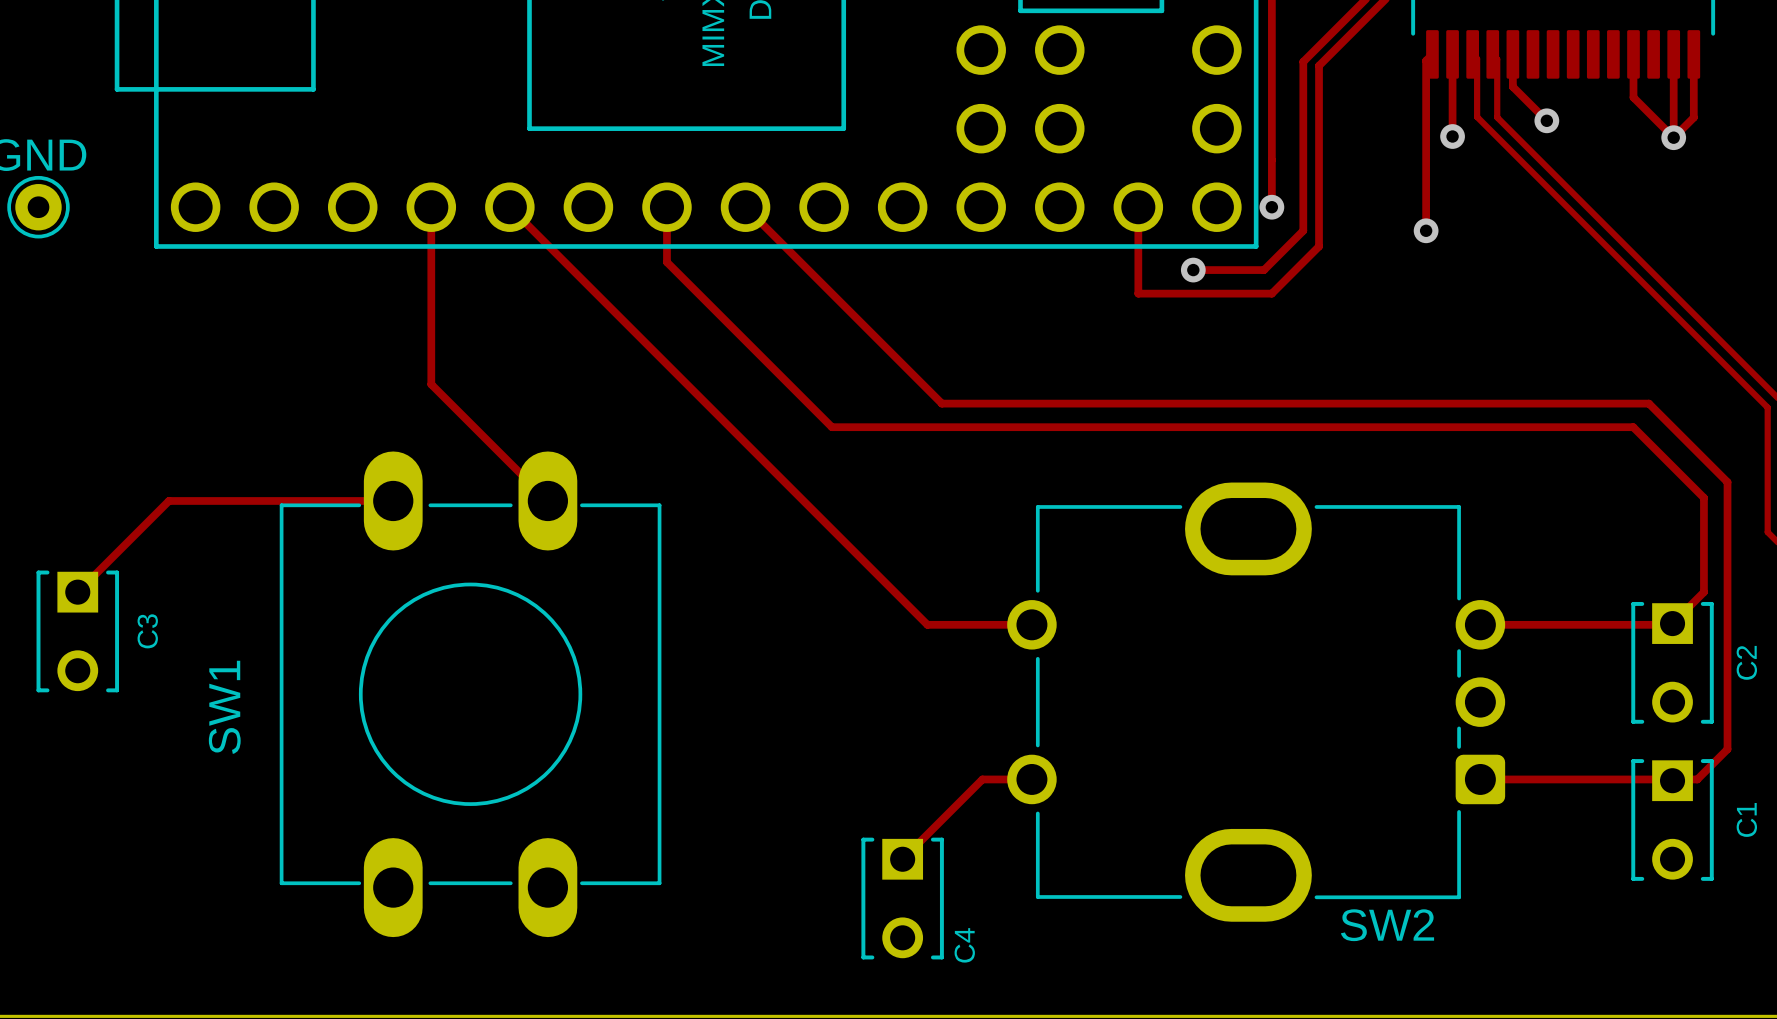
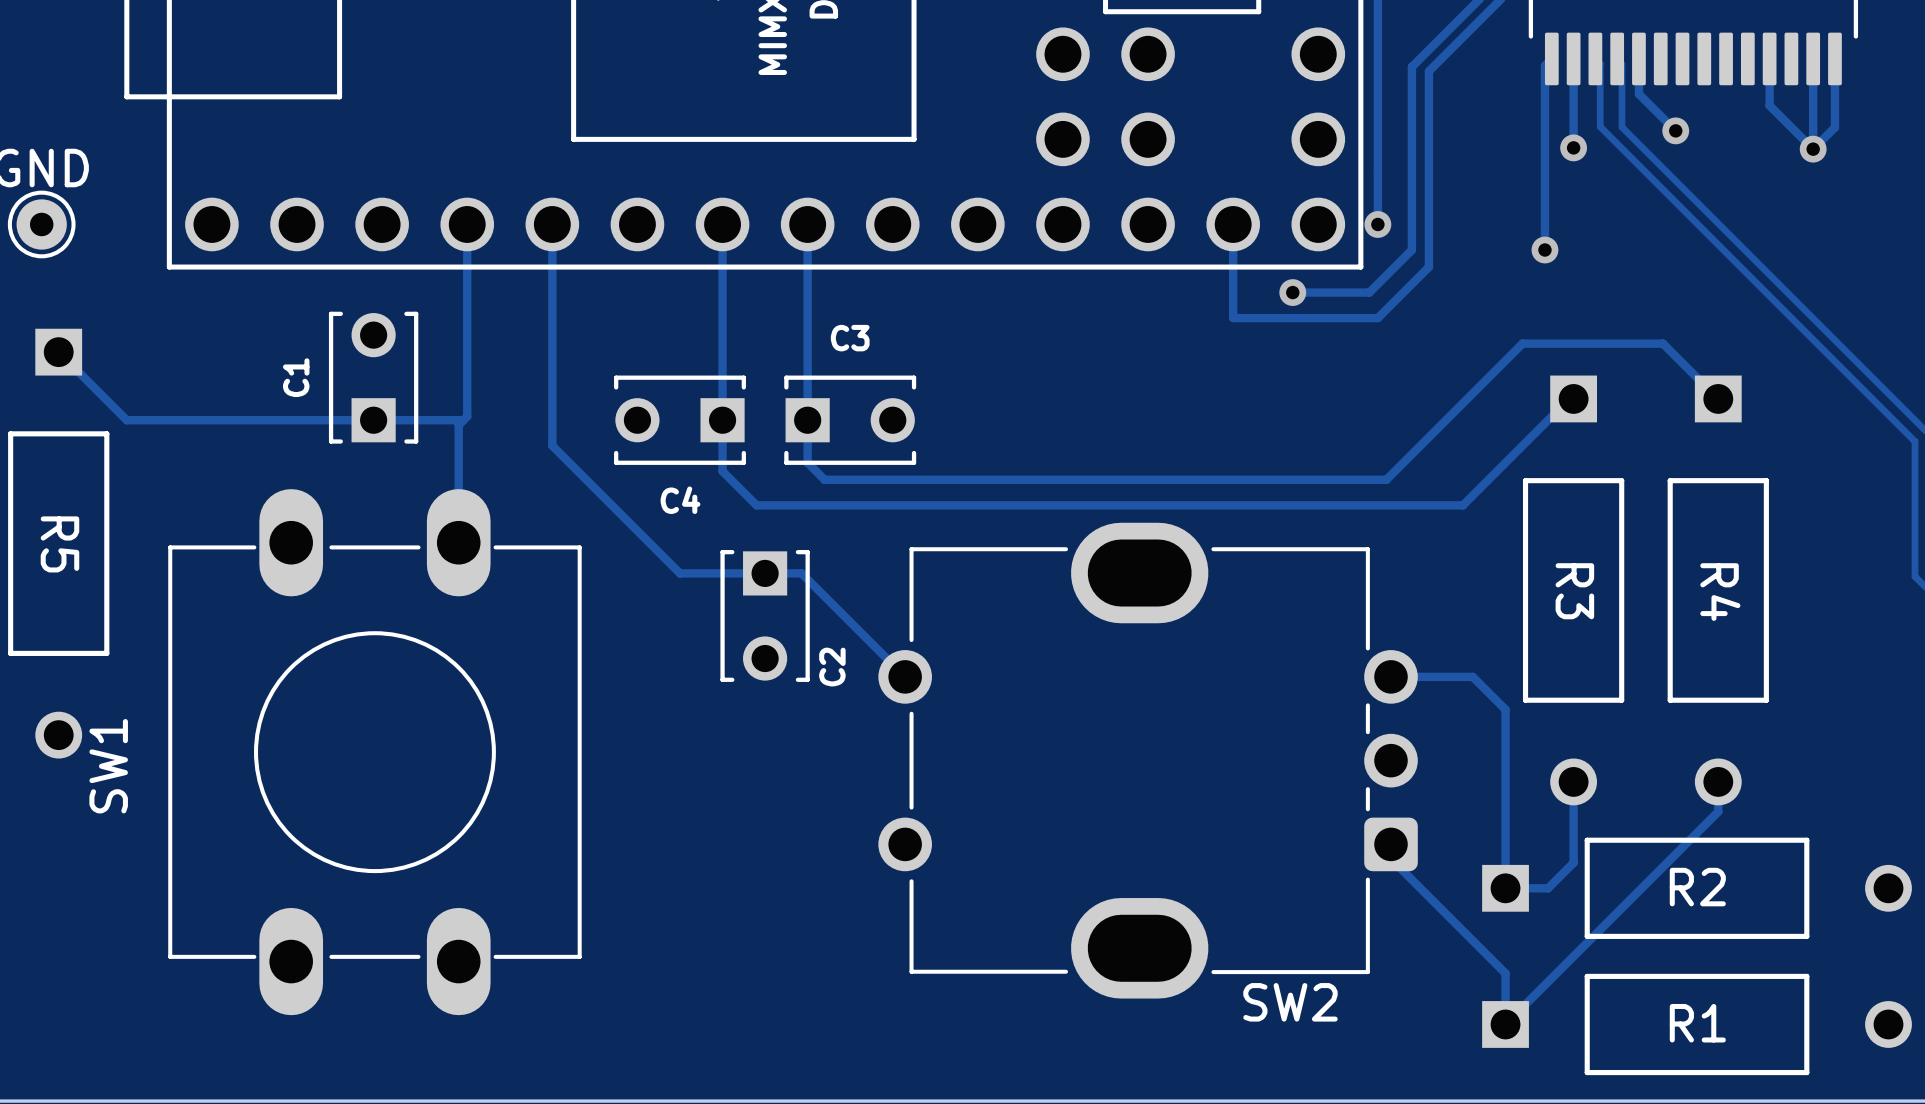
track: (509, 207) (927, 624) (1031, 624) -> (552, 224) (552, 445) (680, 573) (801, 573) (905, 676)
track: (745, 207) (941, 403) (1648, 403) (1727, 482) (1727, 749) (1697, 779) (1480, 779) -> (807, 224) (807, 462) (824, 479) (1386, 479) (1522, 343) (1662, 343) (1718, 398)
track: (666, 262) (831, 427) (1633, 427) (1703, 497) (1703, 592) (1671, 624) (1480, 624) -> (722, 284) (722, 471) (756, 505) (1462, 505) (1569, 398) (1573, 398)
track: none -> (58, 352) (126, 420) (463, 420)
track: (431, 384) (547, 500) -> (467, 416) (458, 424) (458, 542)
track: (393, 500) (168, 500) (77, 592) -> none
R5: none -> (58, 543)
R3: none -> (1573, 590)
R4: none -> (1718, 590)
track: none -> (1391, 676) (1472, 676) (1505, 709) (1505, 888) (1548, 888) (1573, 862) (1573, 781)
C3 rotation: 0° (77, 631) -> 90° counterclockwise (850, 420)
C3 position: (77, 631) -> (850, 420)
C2 position: (1672, 662) -> (765, 615)
C2 name position: C2 (1746, 662) -> C2 (832, 667)
SW1 position: (470, 694) -> (374, 752)
SW2 position: (1256, 702) -> (1148, 760)
track: none -> (1718, 781) (1718, 811) (1505, 1024) (1505, 973) (1391, 858) (1391, 844) (1402, 844)
track: (1031, 779) (982, 779) (902, 859) -> none
R2: none -> (1697, 888)
C1 rotation: 0° (1672, 819) -> 180° (373, 377)
C1 position: (1672, 819) -> (373, 377)
C4 rotation: 0° (902, 898) -> 90° clockwise (680, 420)
C4 position: (902, 898) -> (680, 420)
R1: none -> (1697, 1024)

